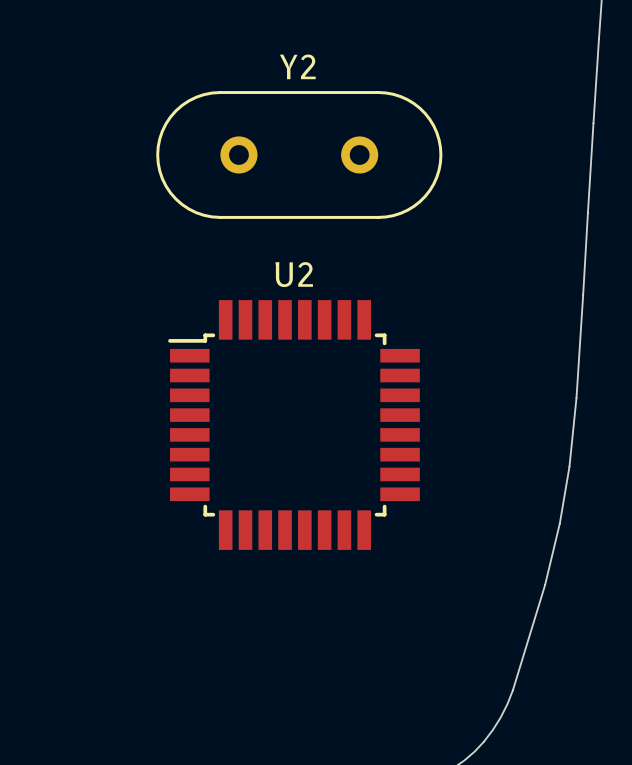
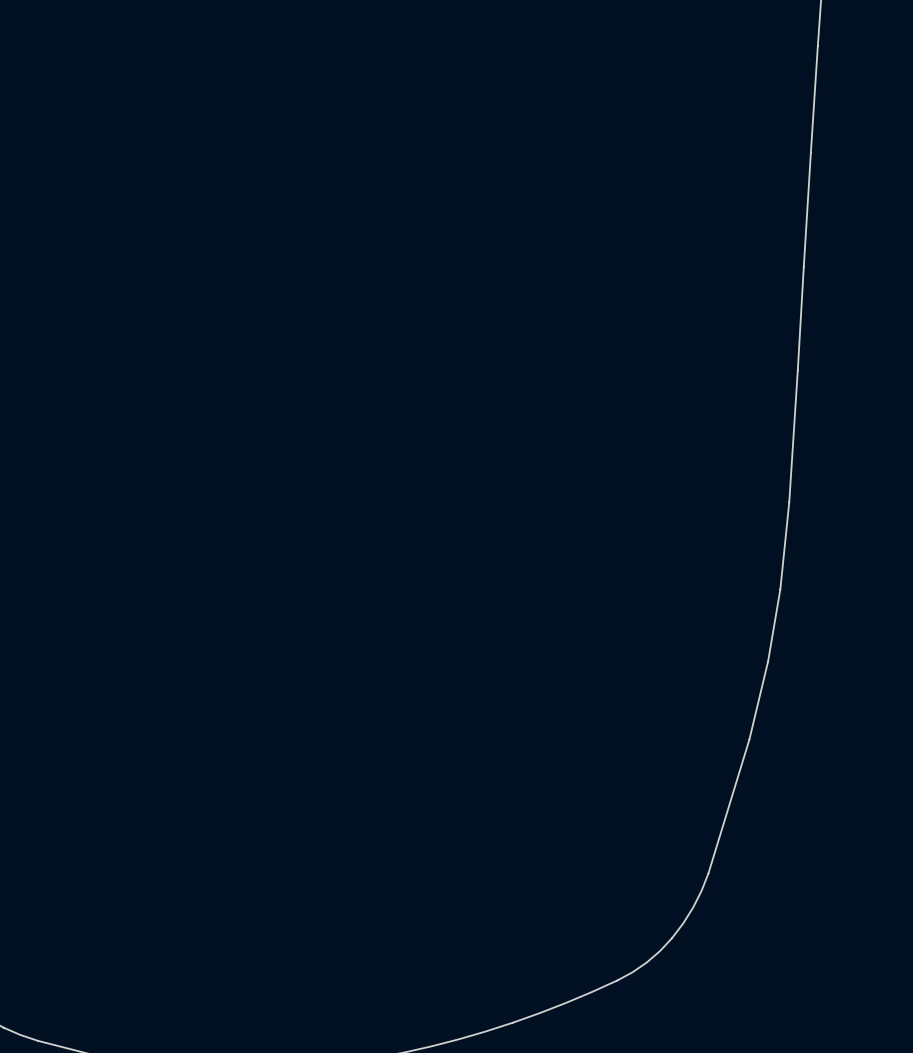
Y2: (299, 154) -> none
U2: (294, 424) -> none

